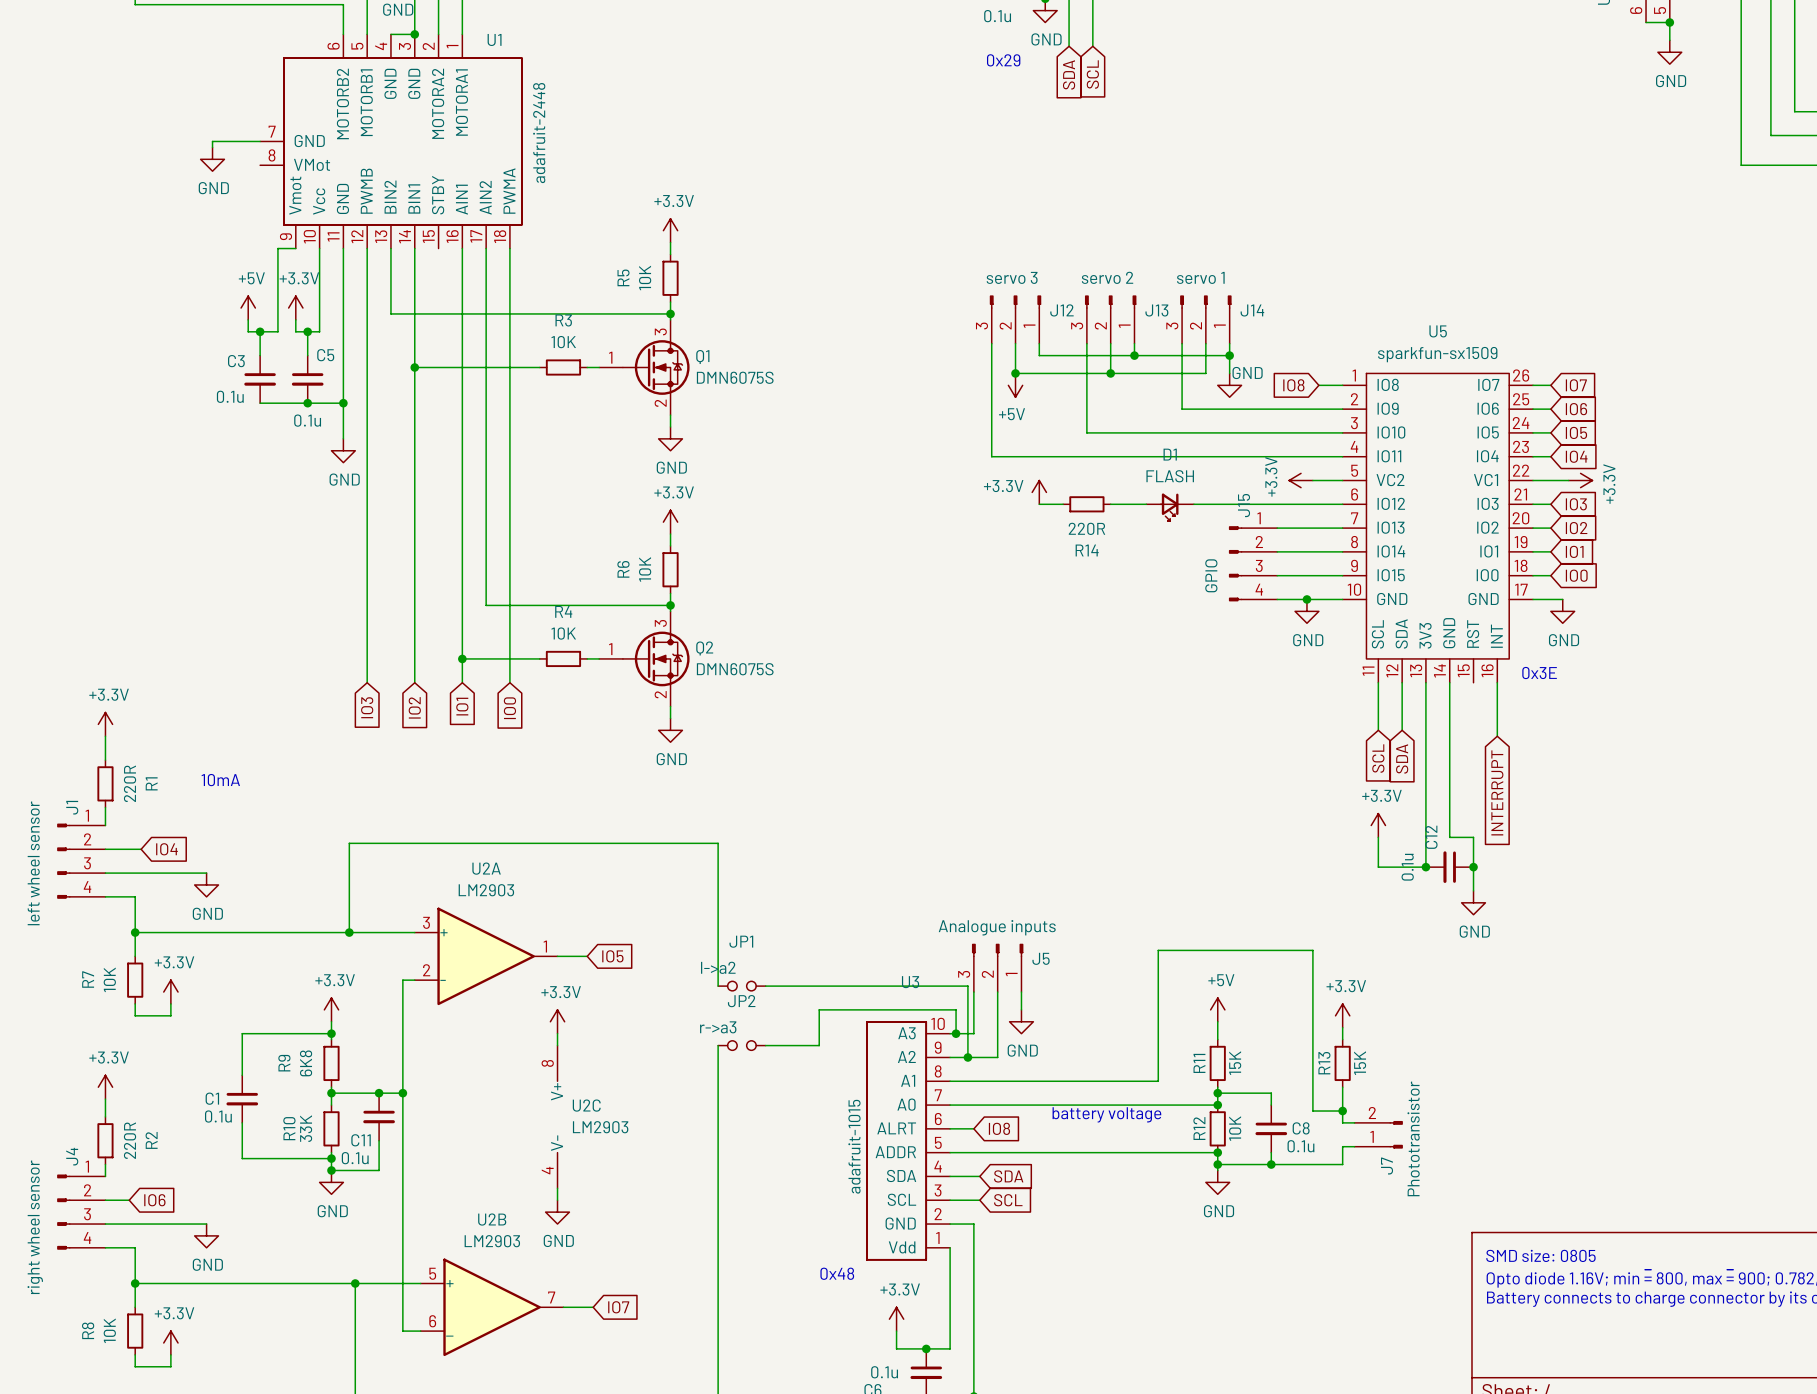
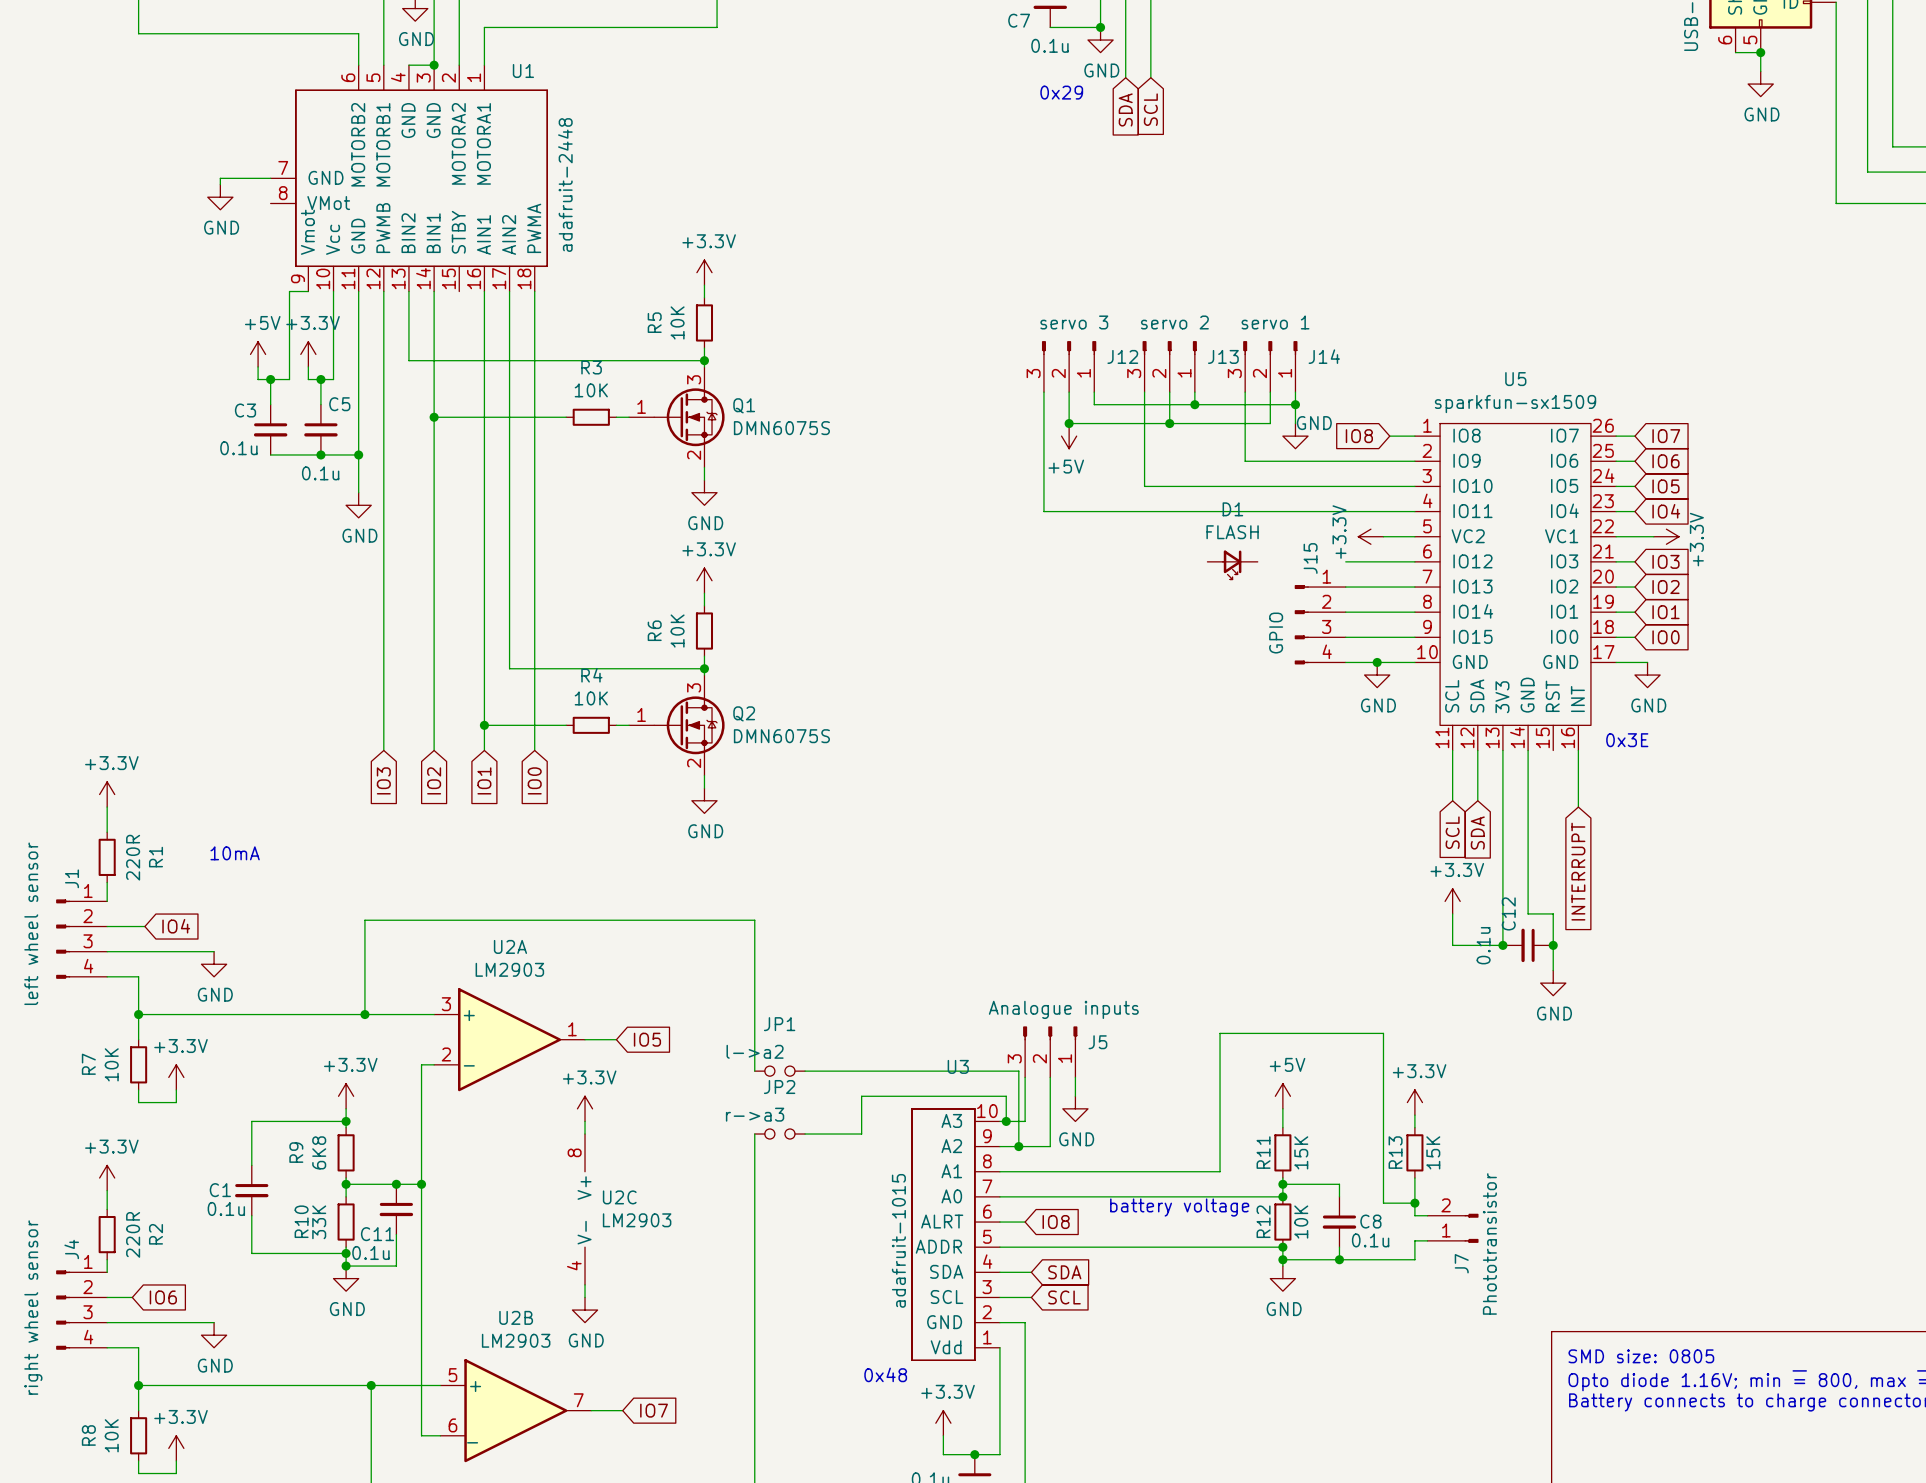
power symbol: +3.3V (1039, 492) -> none
wire: (1039, 504) (1063, 504) -> none
R14: 220R (1086, 504) -> none
wire: (1110, 504) (1146, 504) -> none
wire: (1193, 504) (1277, 504) -> none

